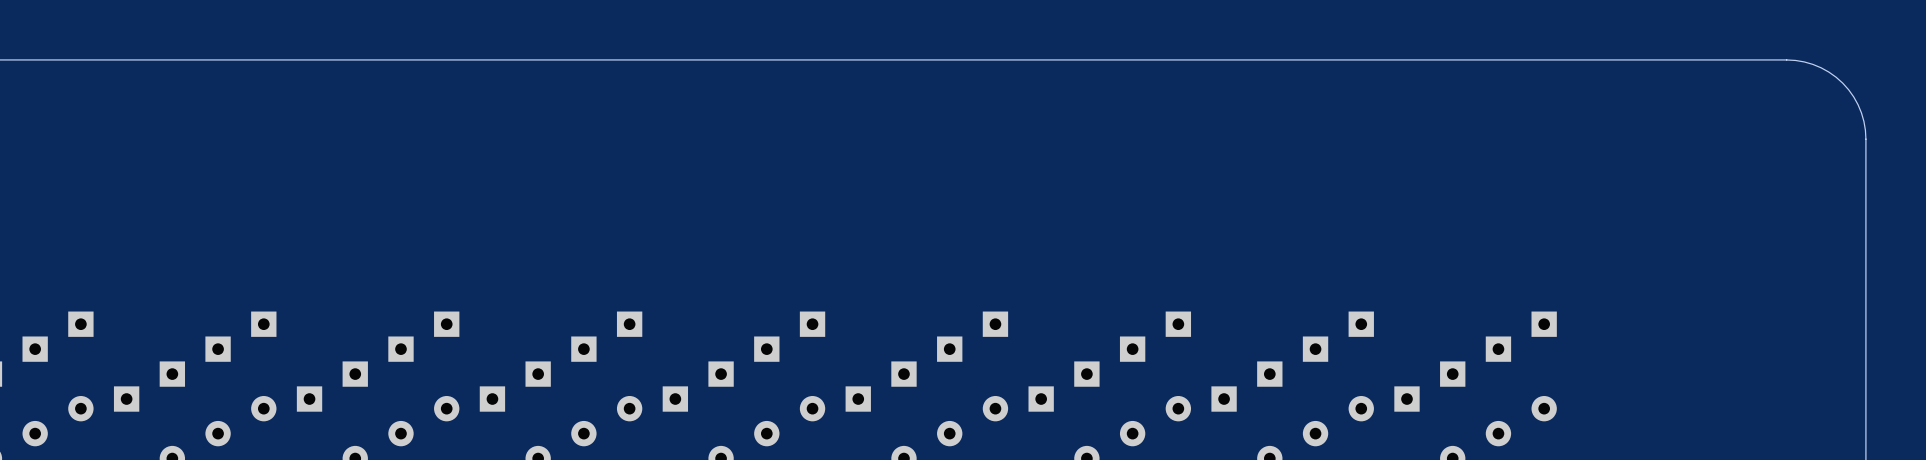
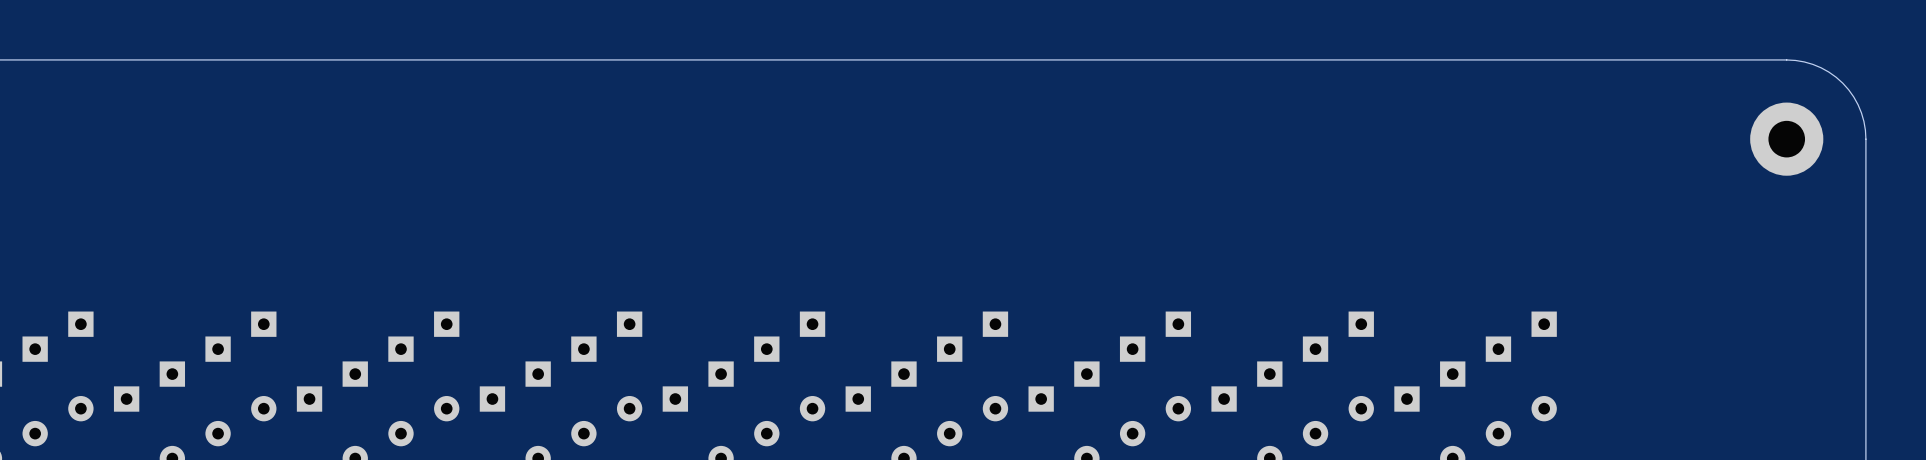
part: none -> (1786, 139)

